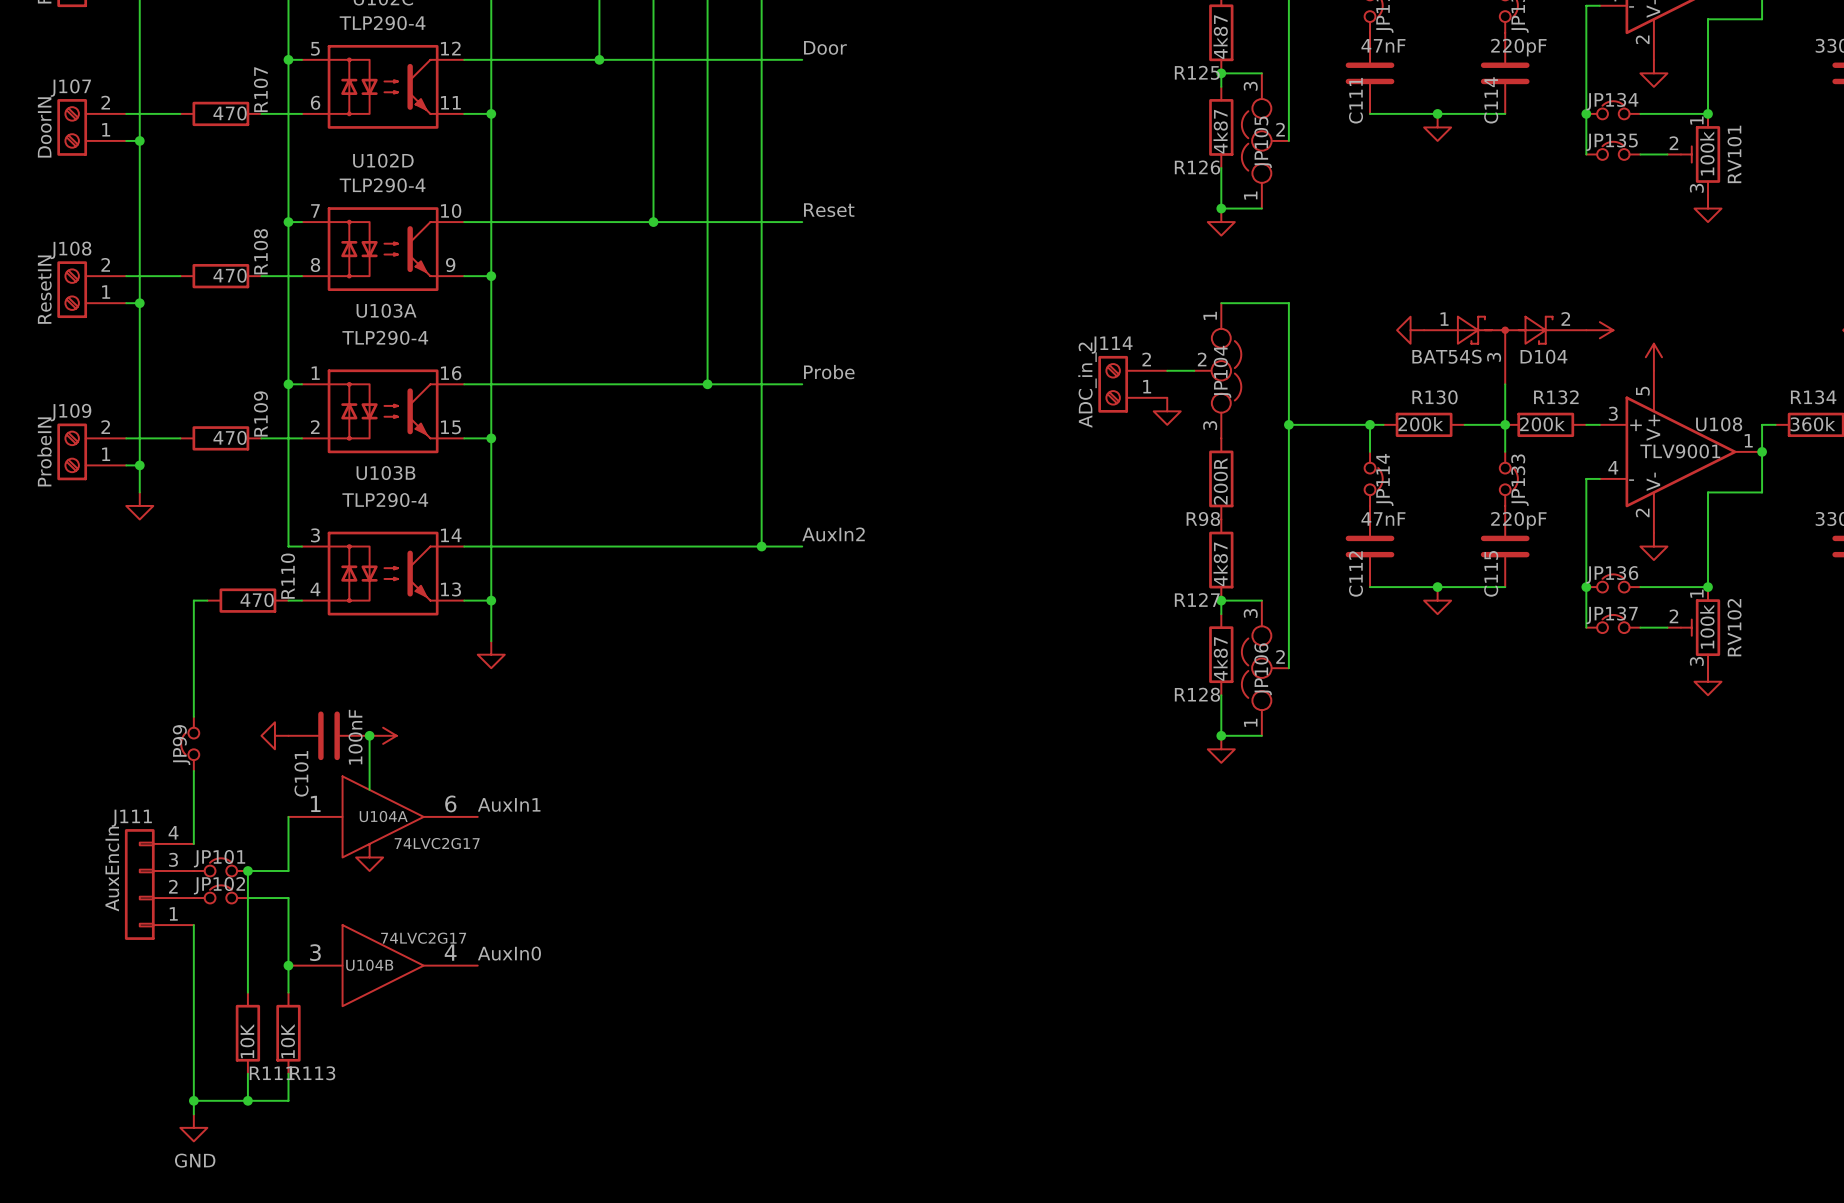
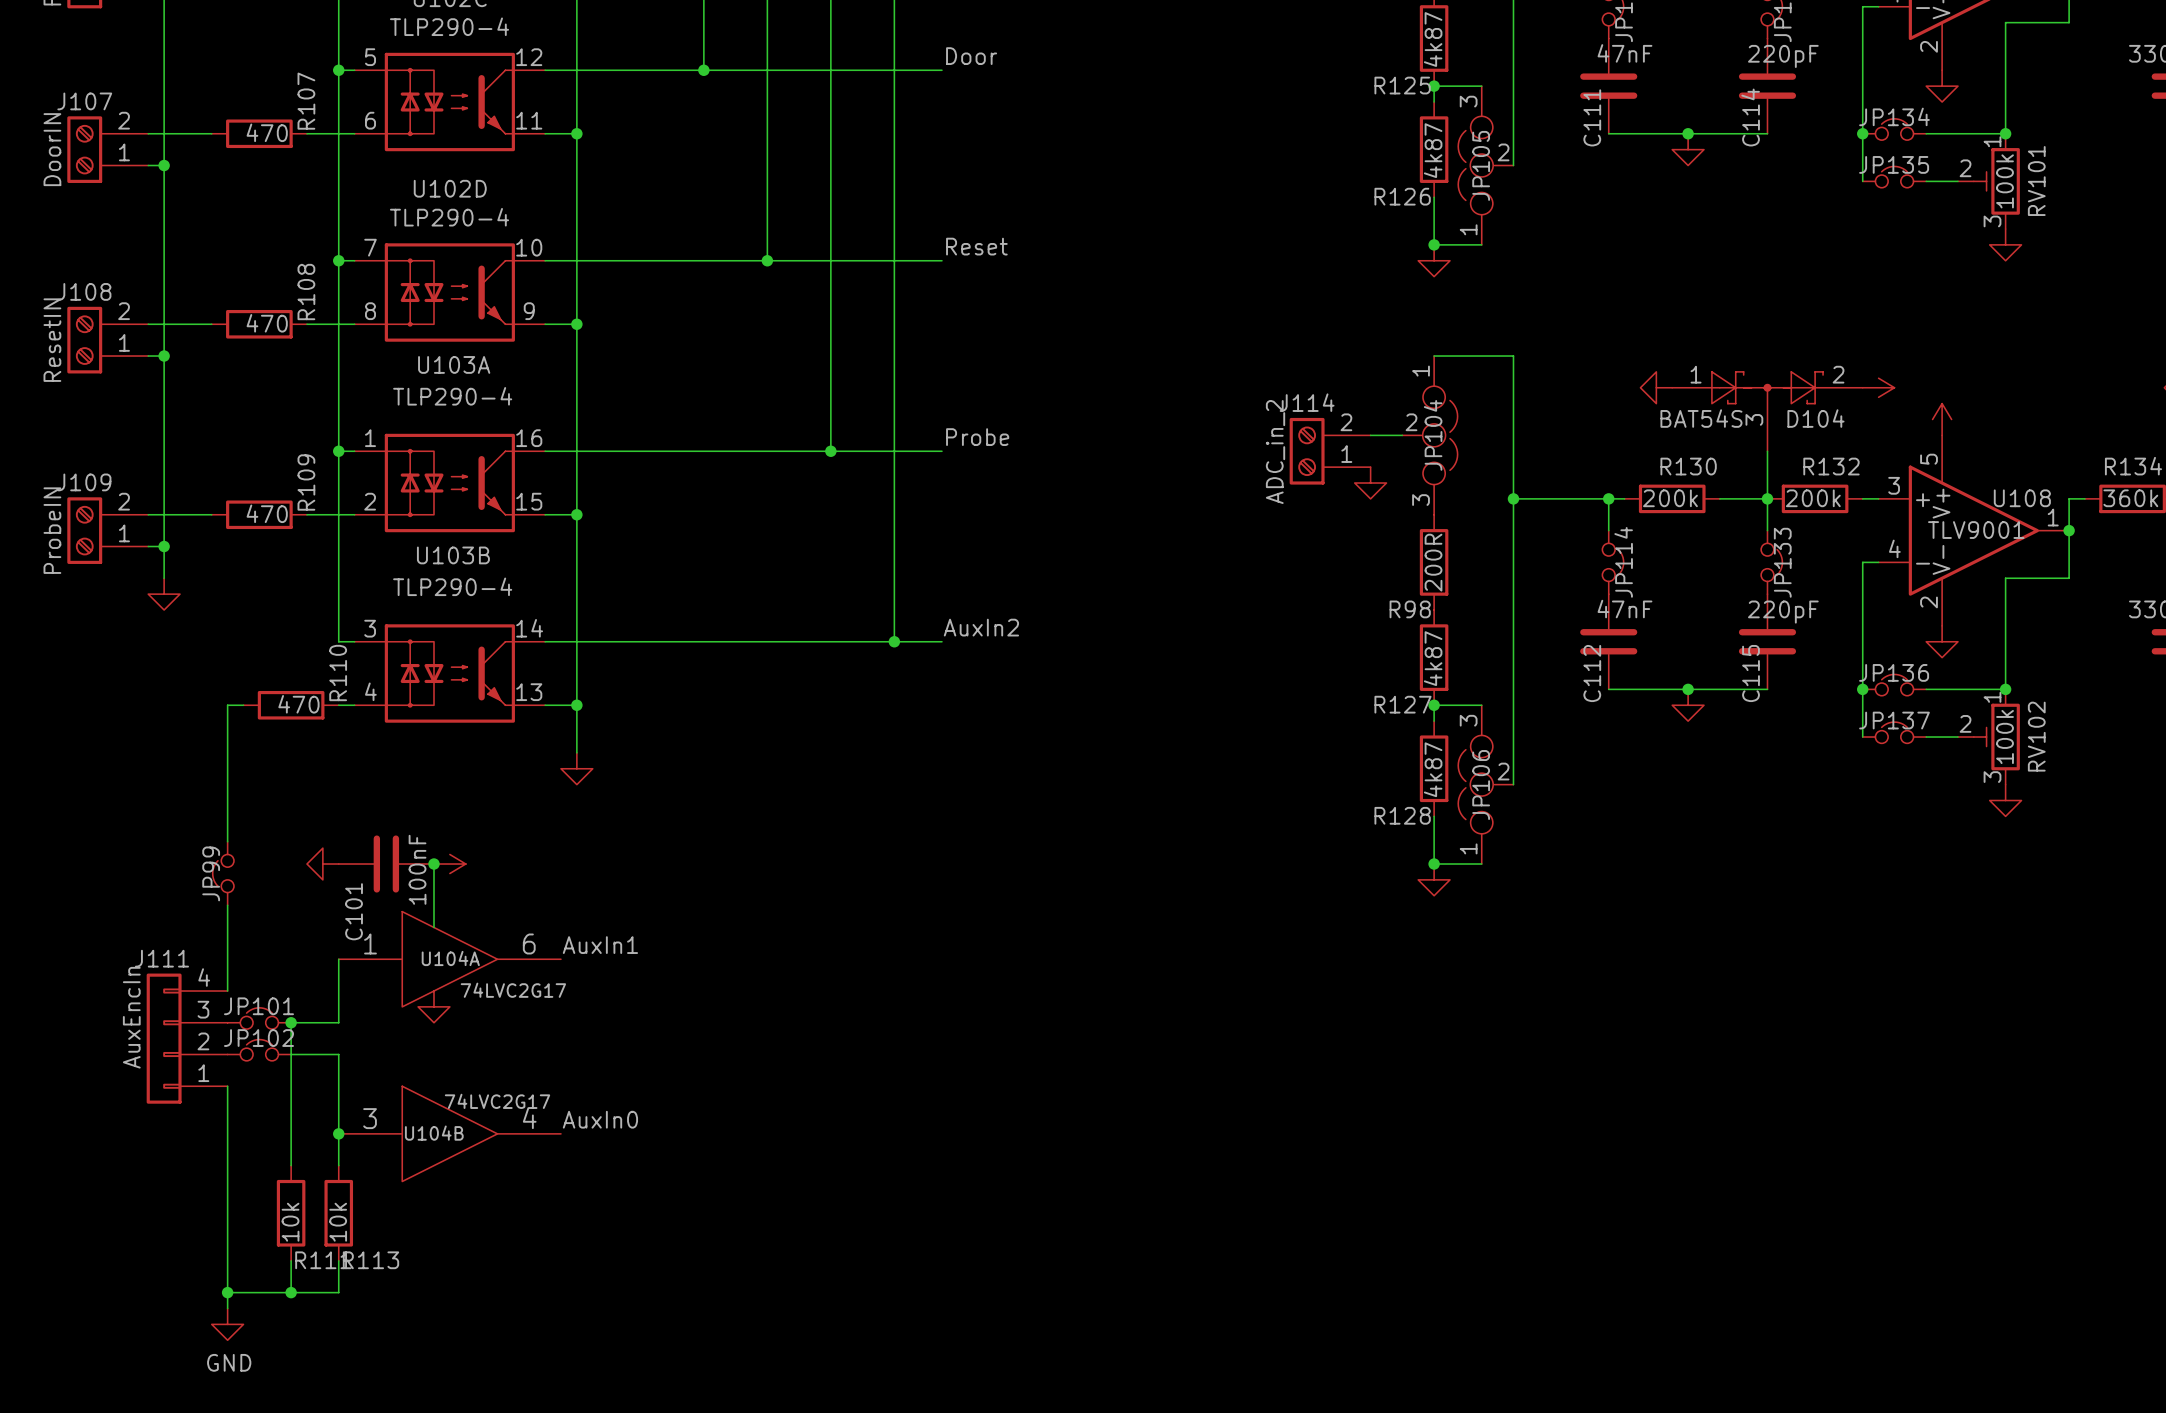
R111 value: 10K (247, 1041) -> 10k (290, 1222)
R113 value: 10K (287, 1041) -> 10k (338, 1222)

